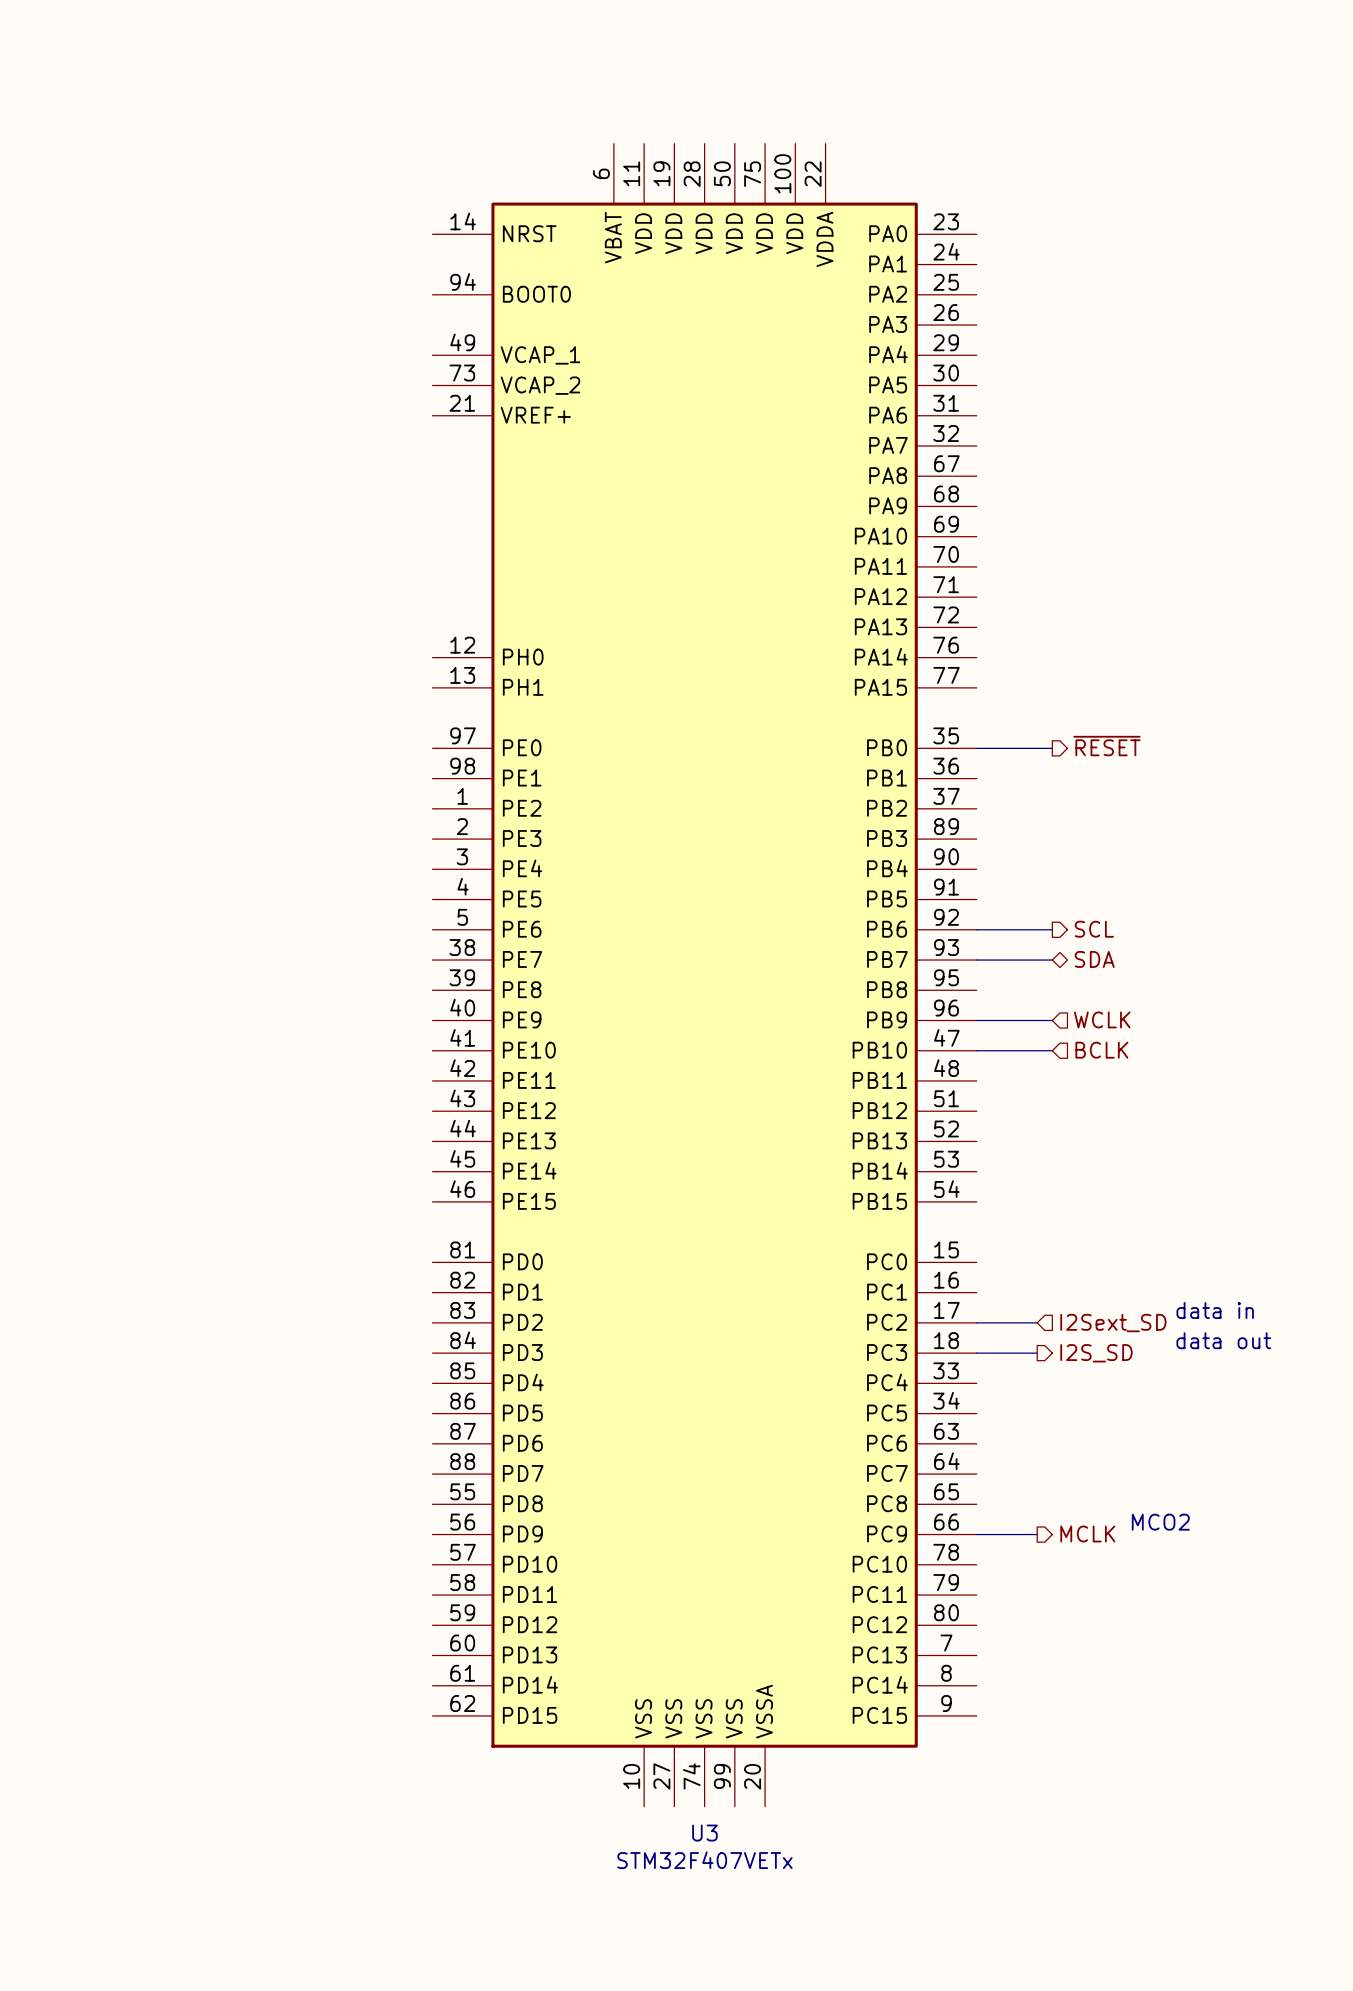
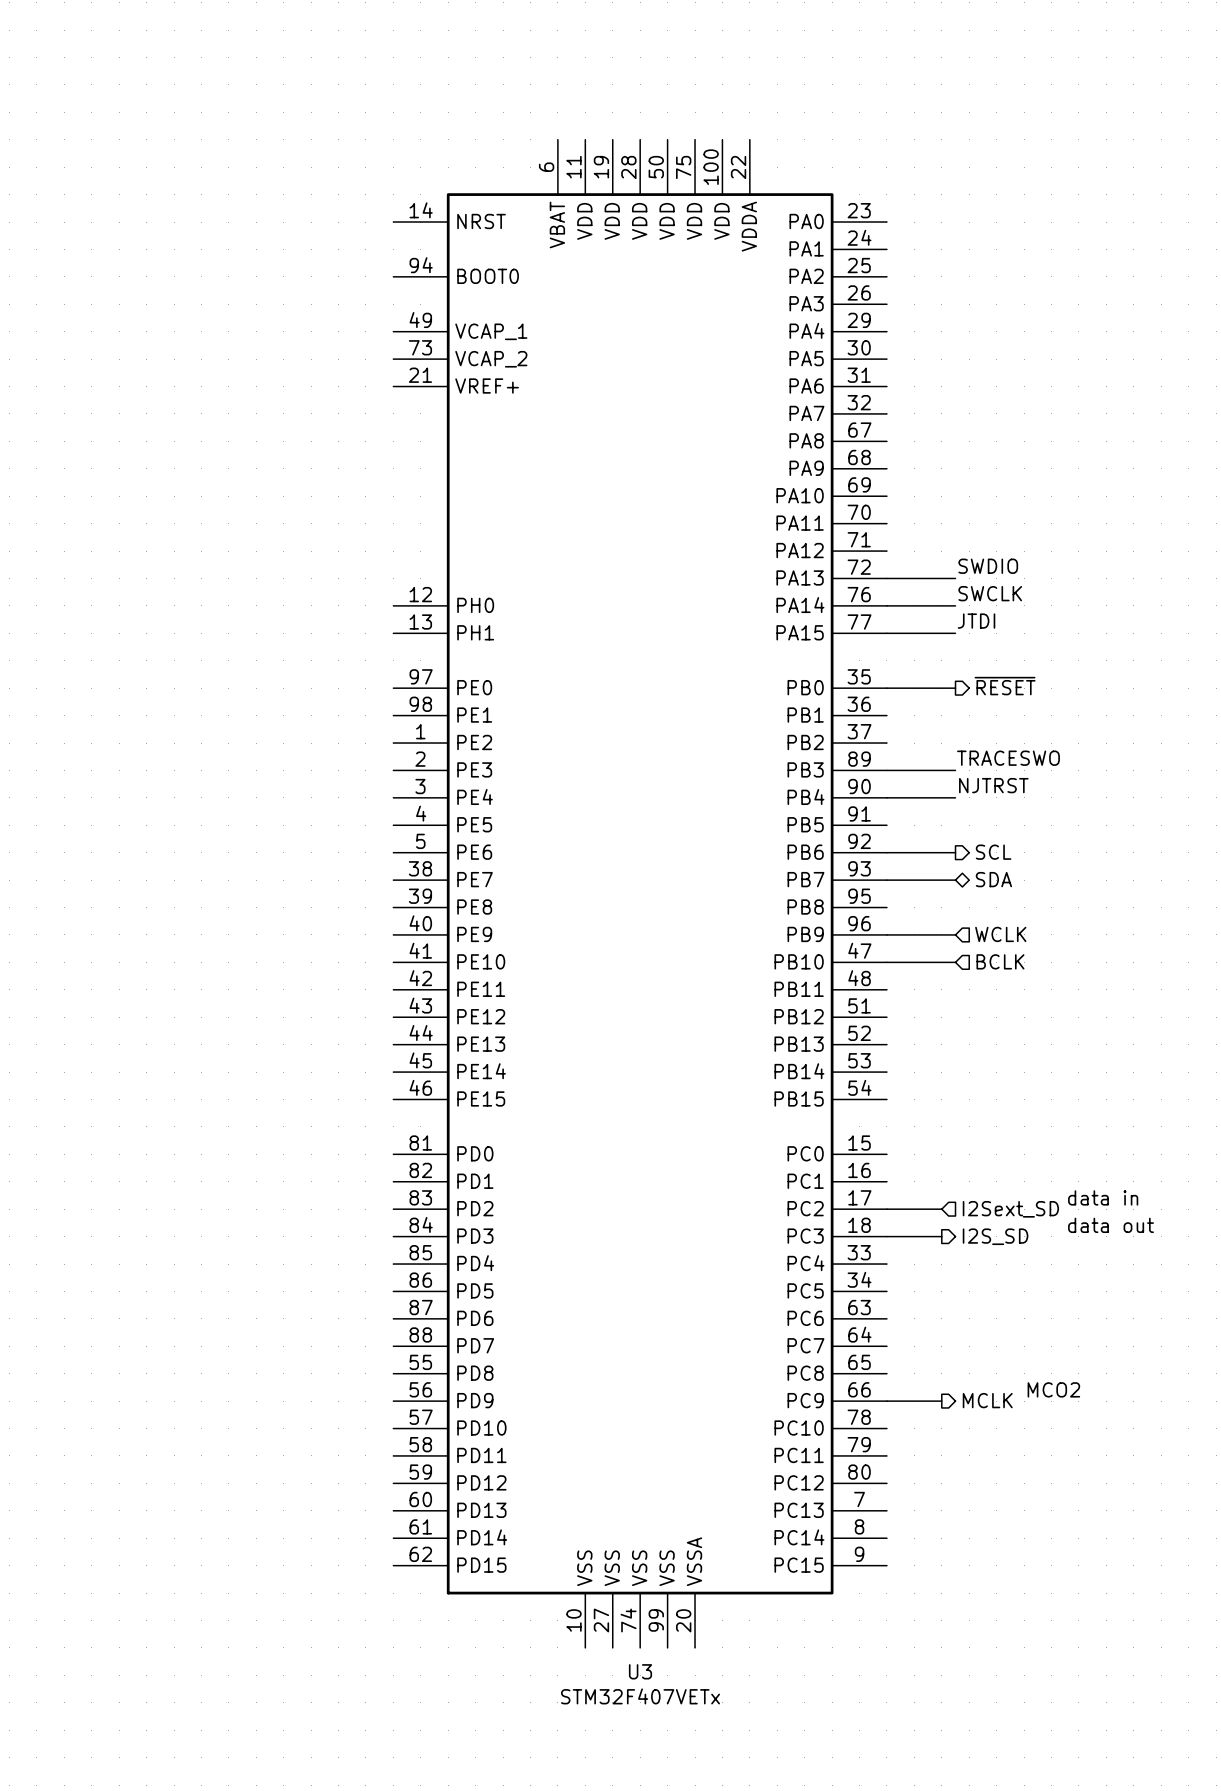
label: none -> SWDIO (988, 566)
wire: none -> (886, 578) (955, 578)
label: none -> SWCLK (990, 593)
wire: none -> (886, 605) (955, 605)
label: none -> JTDI (976, 621)
wire: none -> (886, 633) (955, 633)
label: none -> TRACESWO (1008, 758)
wire: none -> (886, 770) (955, 770)
label: none -> NJTRST (993, 785)
wire: none -> (886, 797) (955, 797)

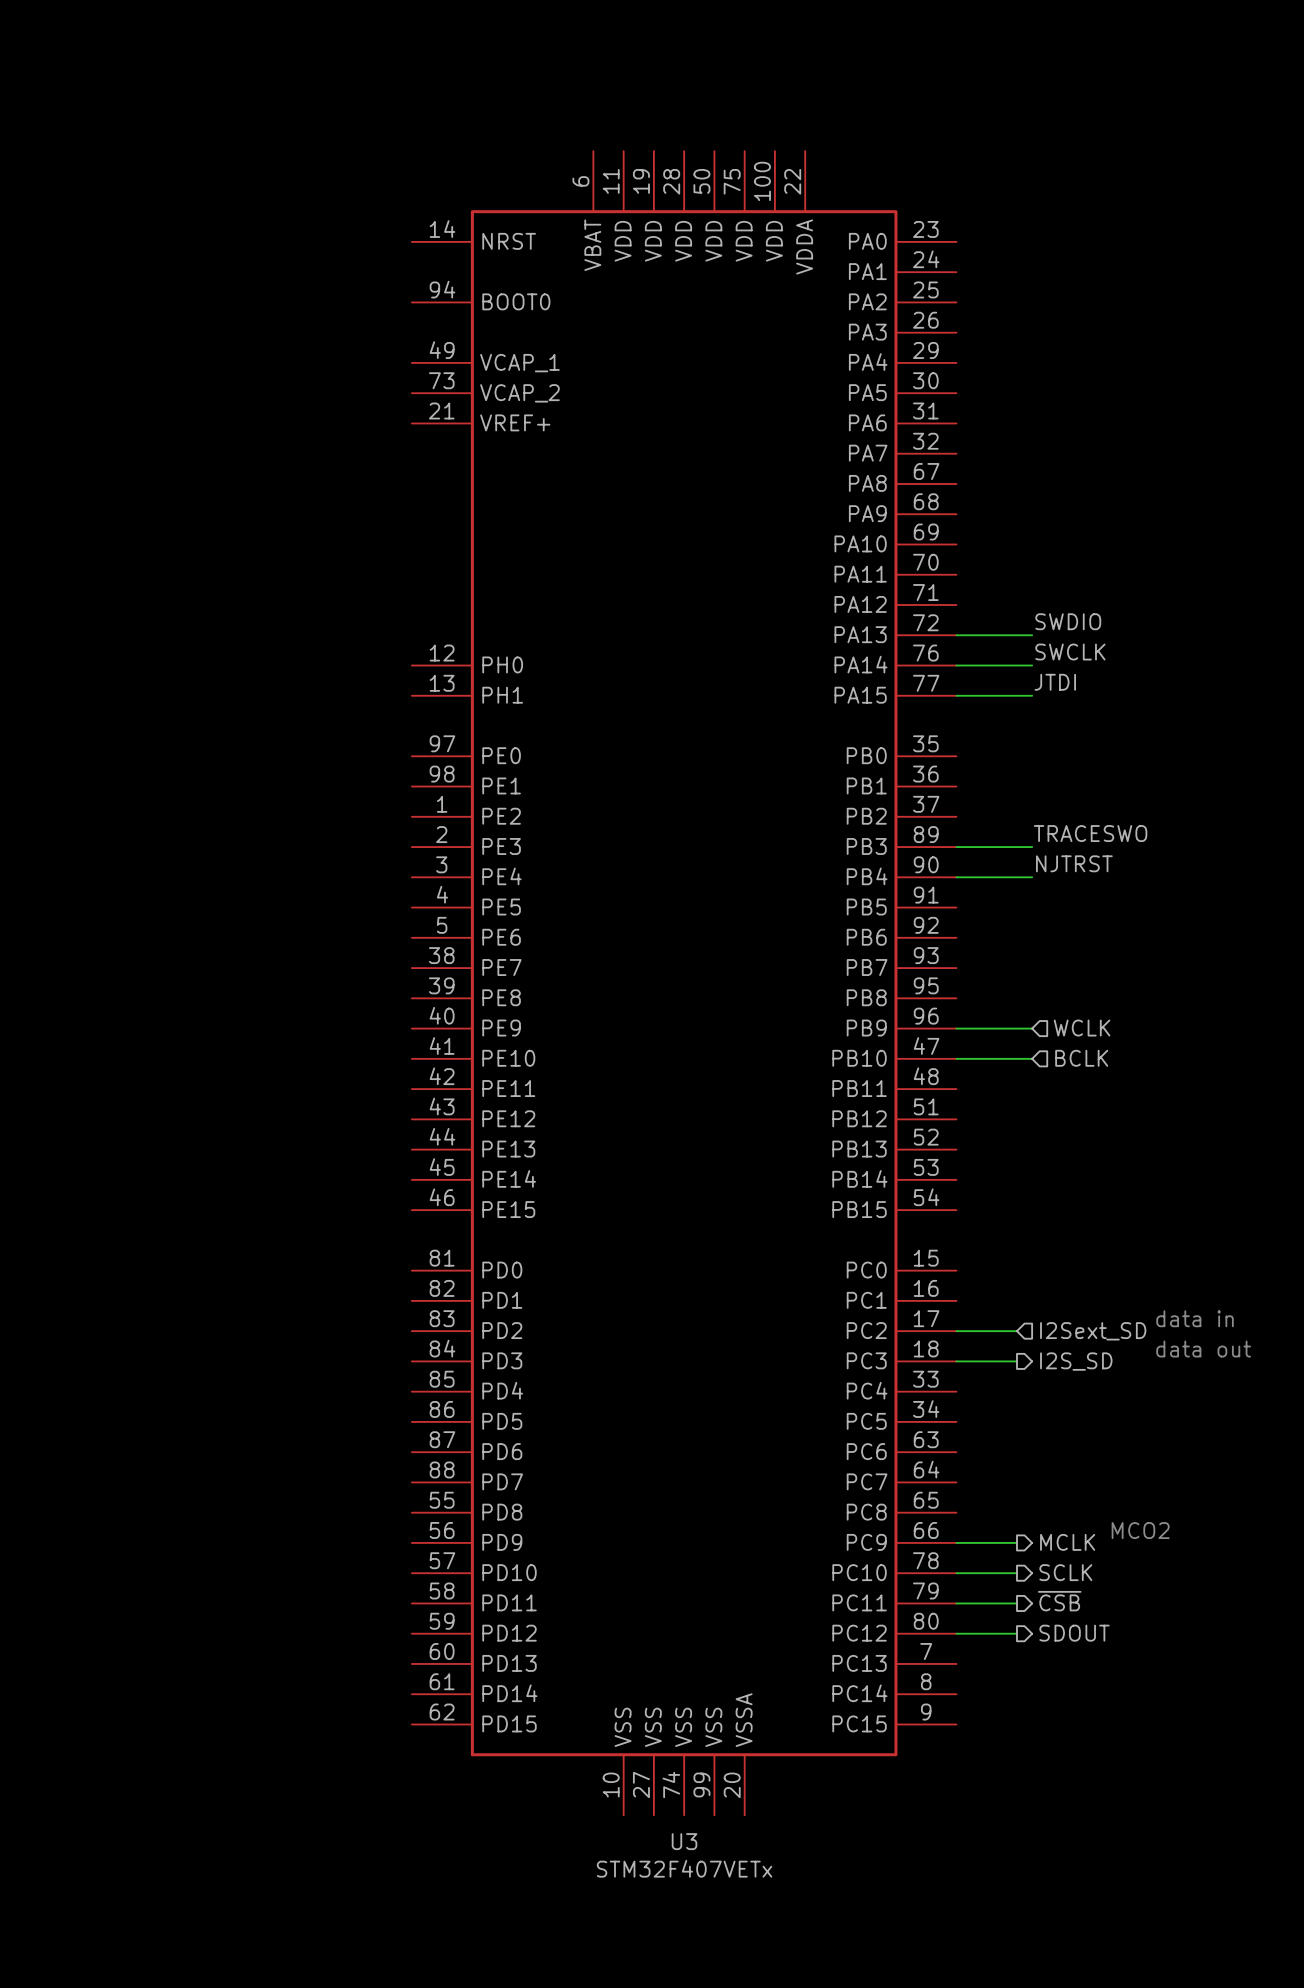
hierarchical label: ~{RESET} (1005, 686) -> none
wire: (886, 688) (955, 688) -> none
wire: (886, 852) (955, 852) -> none
hierarchical label: SCL (993, 852) -> none
hierarchical label: SDA (993, 879) -> none
wire: (886, 880) (955, 880) -> none
wire: none -> (956, 1573) (1016, 1573)
hierarchical label: none -> SCLK (1065, 1572)
hierarchical label: none -> ~{CSB} (1059, 1601)
wire: none -> (956, 1603) (1016, 1603)
hierarchical label: none -> SDOUT (1074, 1633)
wire: none -> (956, 1633) (1016, 1633)

